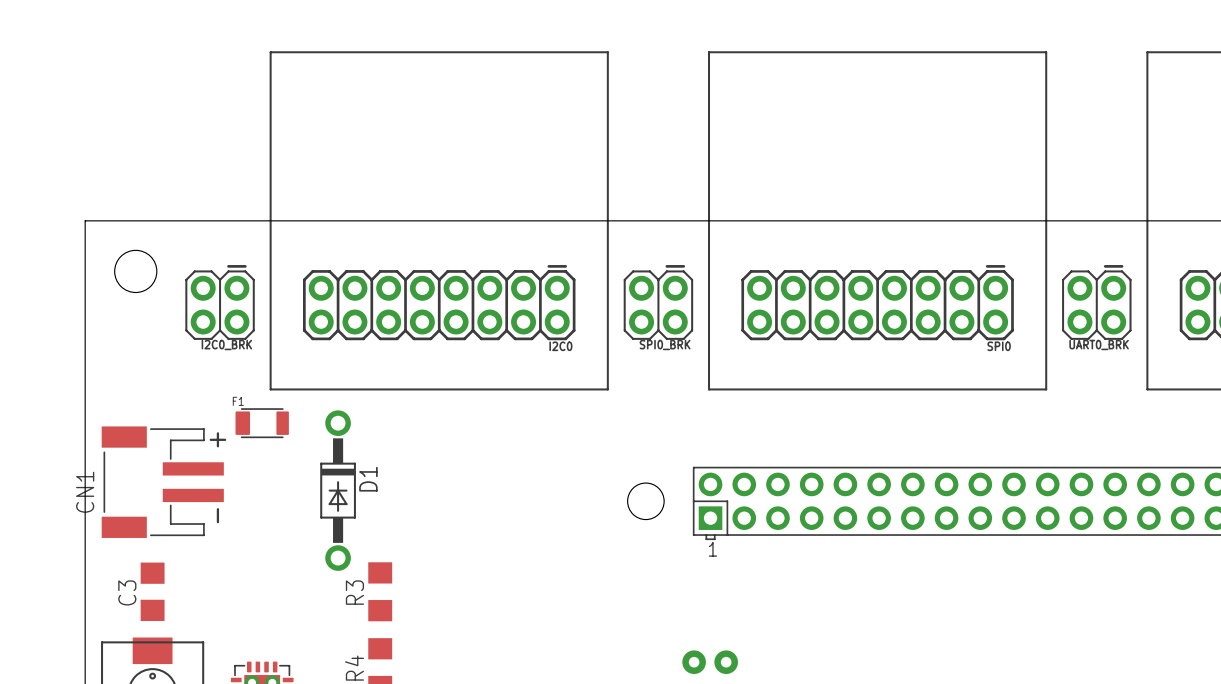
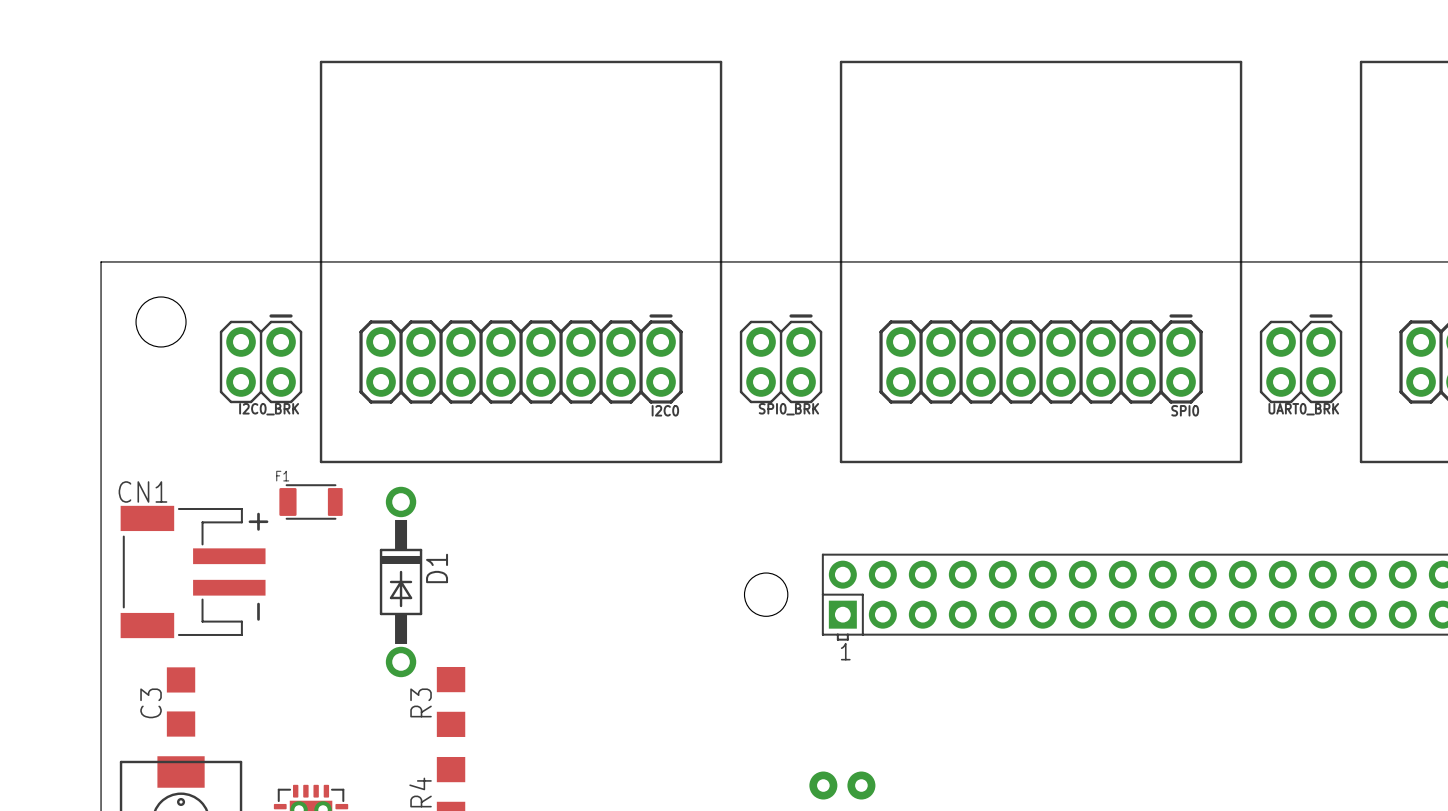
CN1 name rotation: 0° (85, 492) -> 90° clockwise (142, 491)
CN1 name position: CN1 (85, 492) -> CN1 (142, 491)

